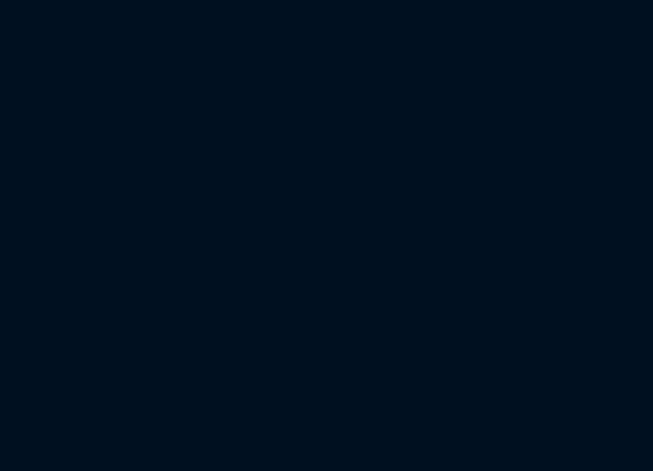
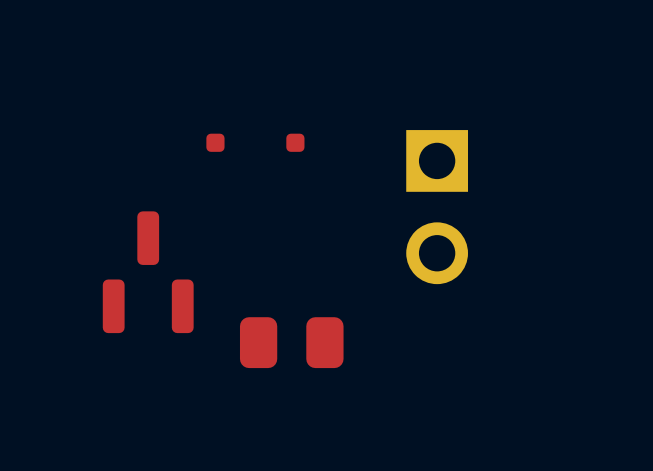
part: none -> (255, 142)
part: none -> (437, 207)
part: none -> (148, 272)
part: none -> (291, 342)

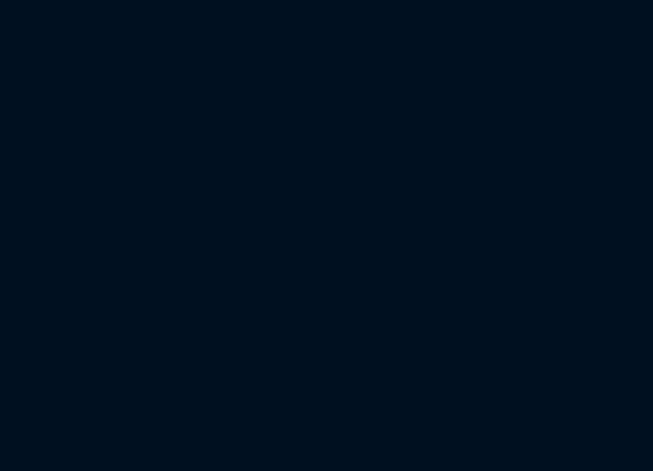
part: (255, 142) -> none
part: (437, 207) -> none
part: (148, 272) -> none
part: (291, 342) -> none

